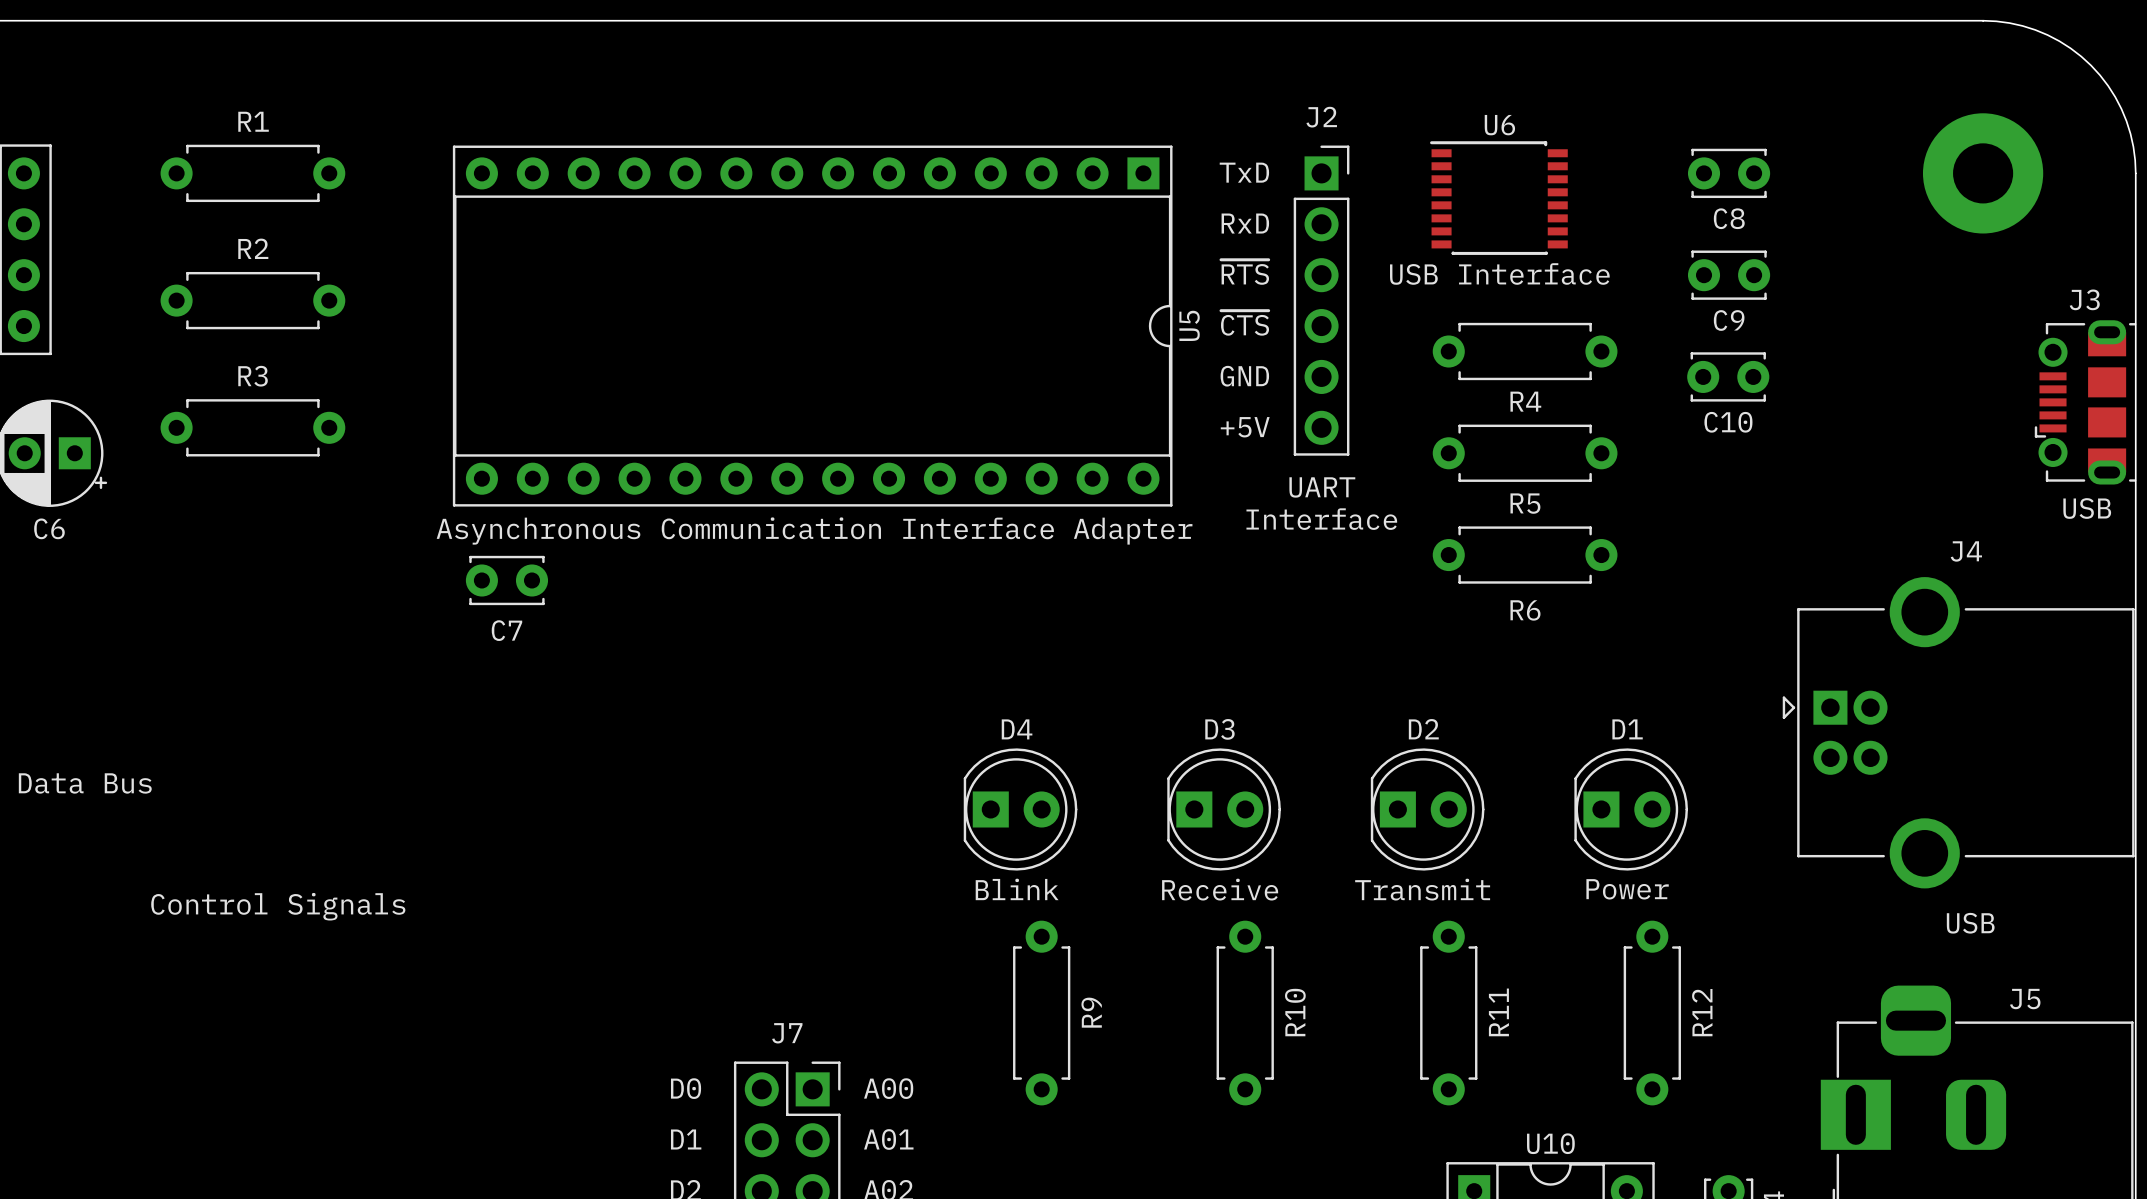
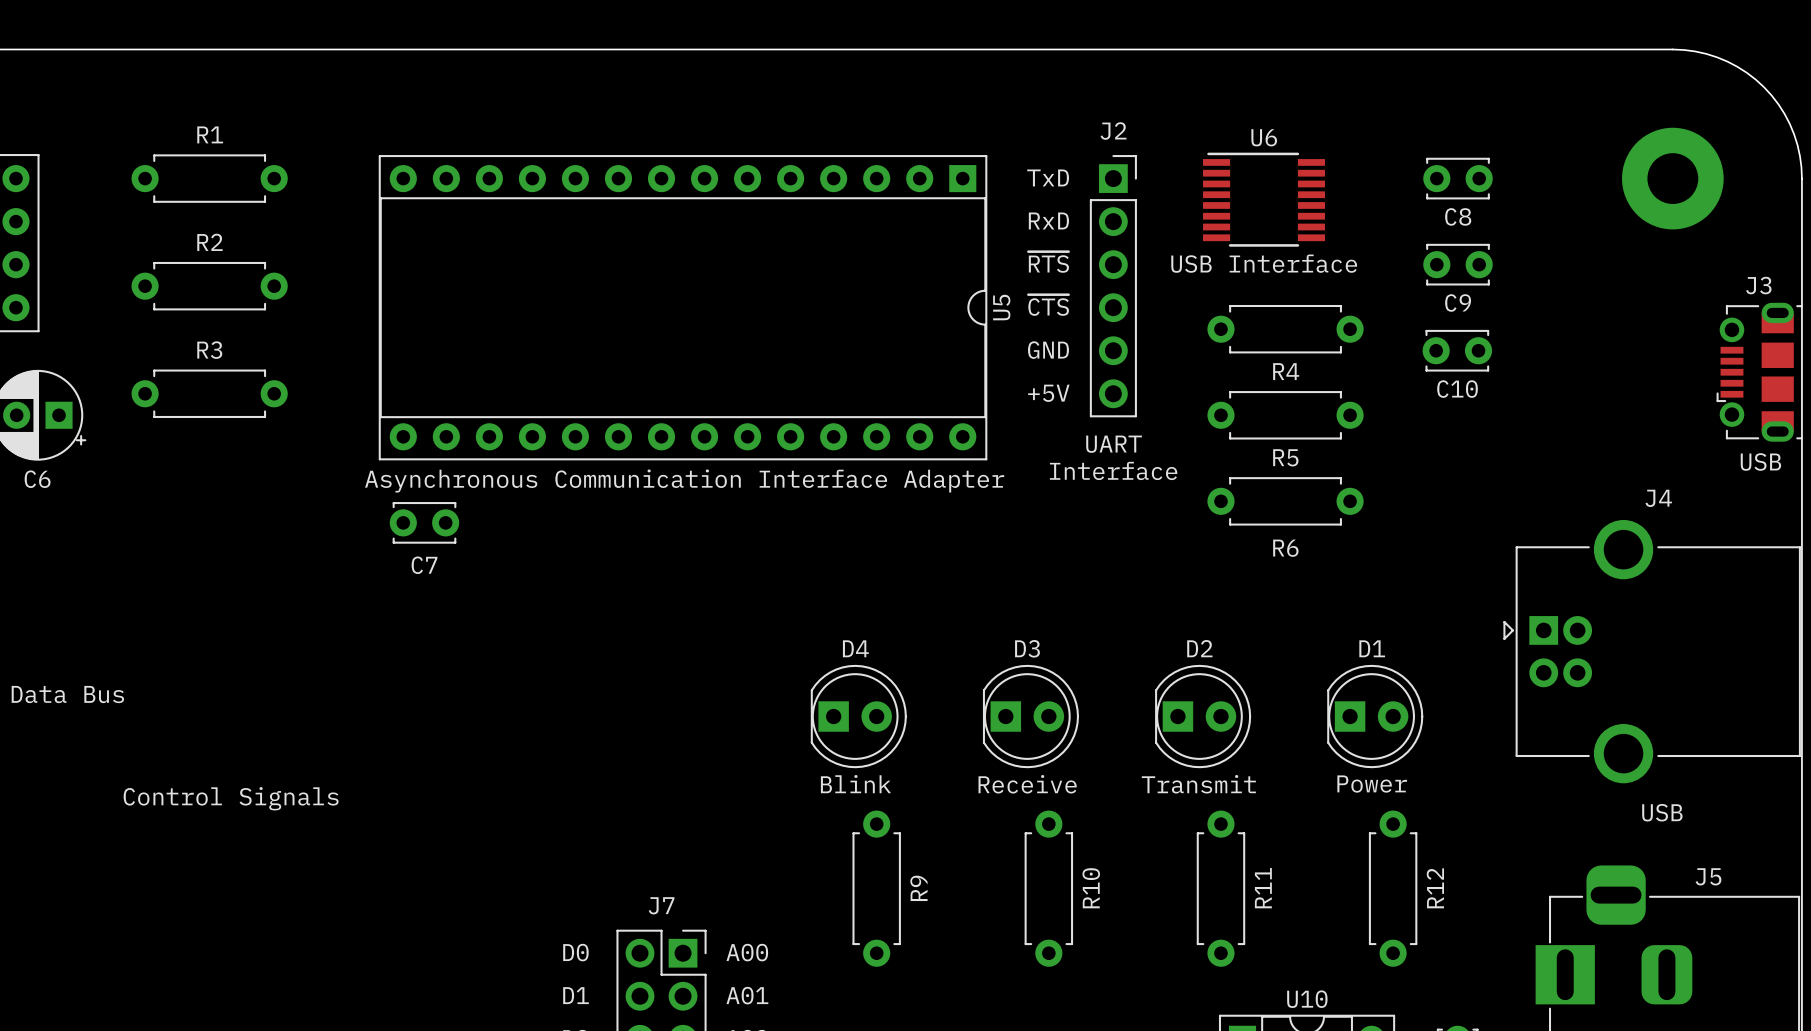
U6 footprint: [1430, 141, 1568, 255] -> [1203, 152, 1326, 247]

